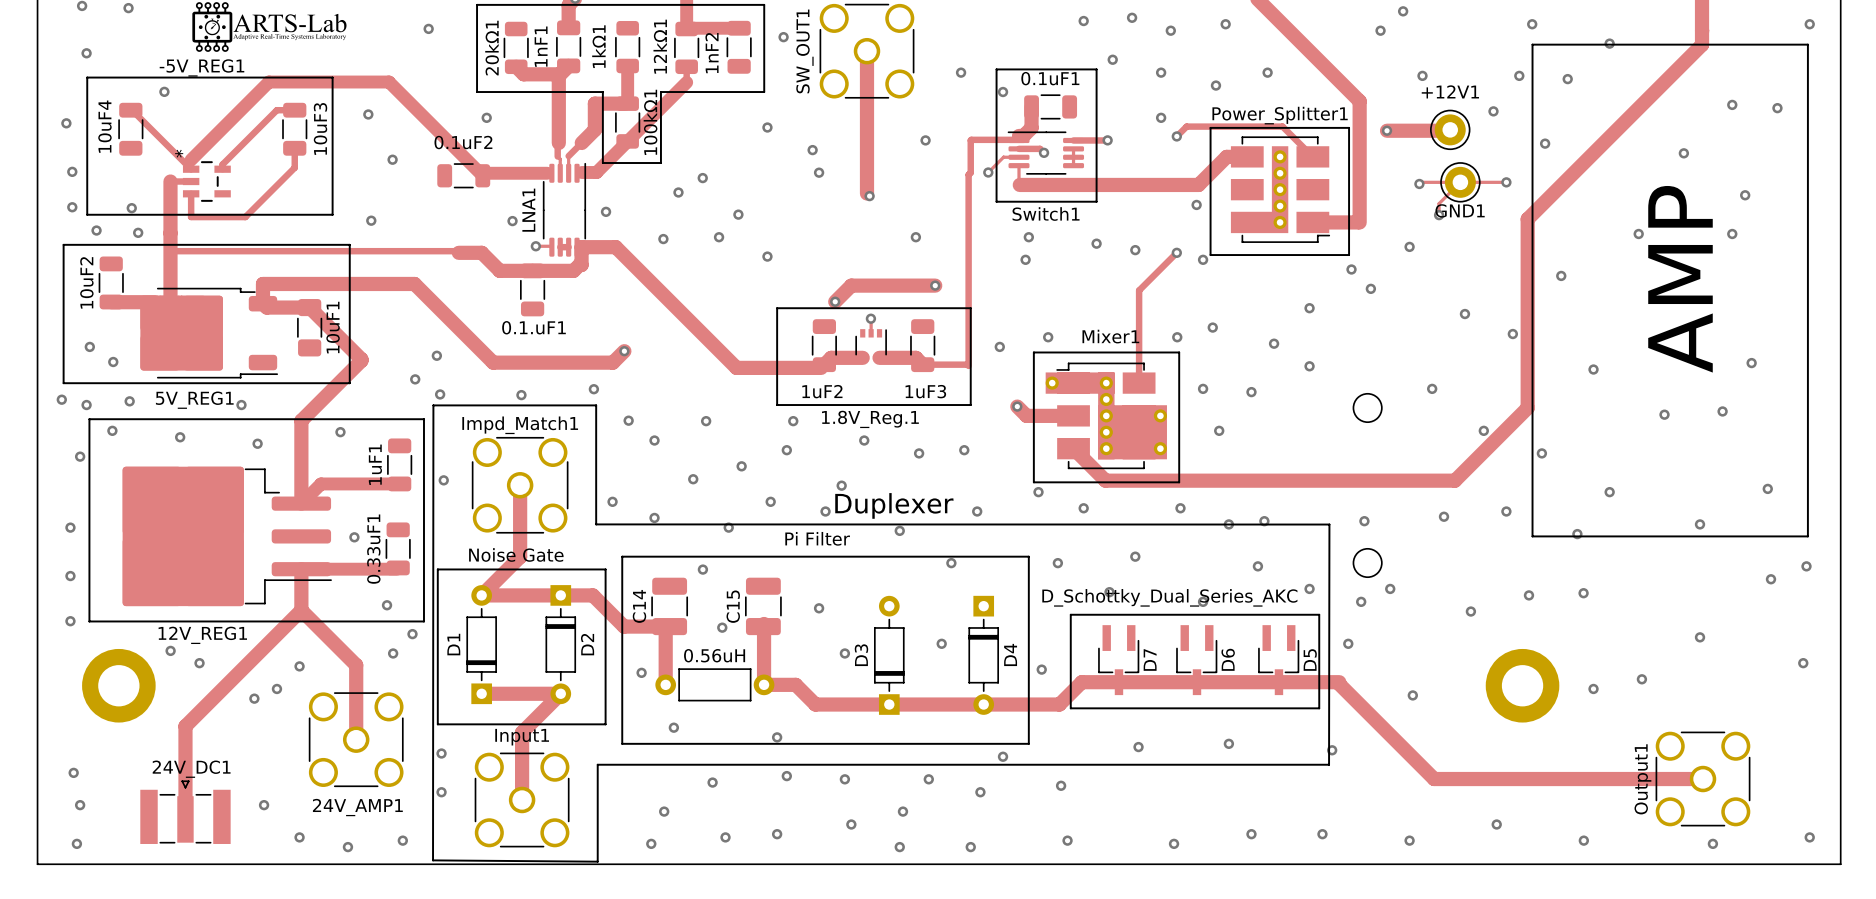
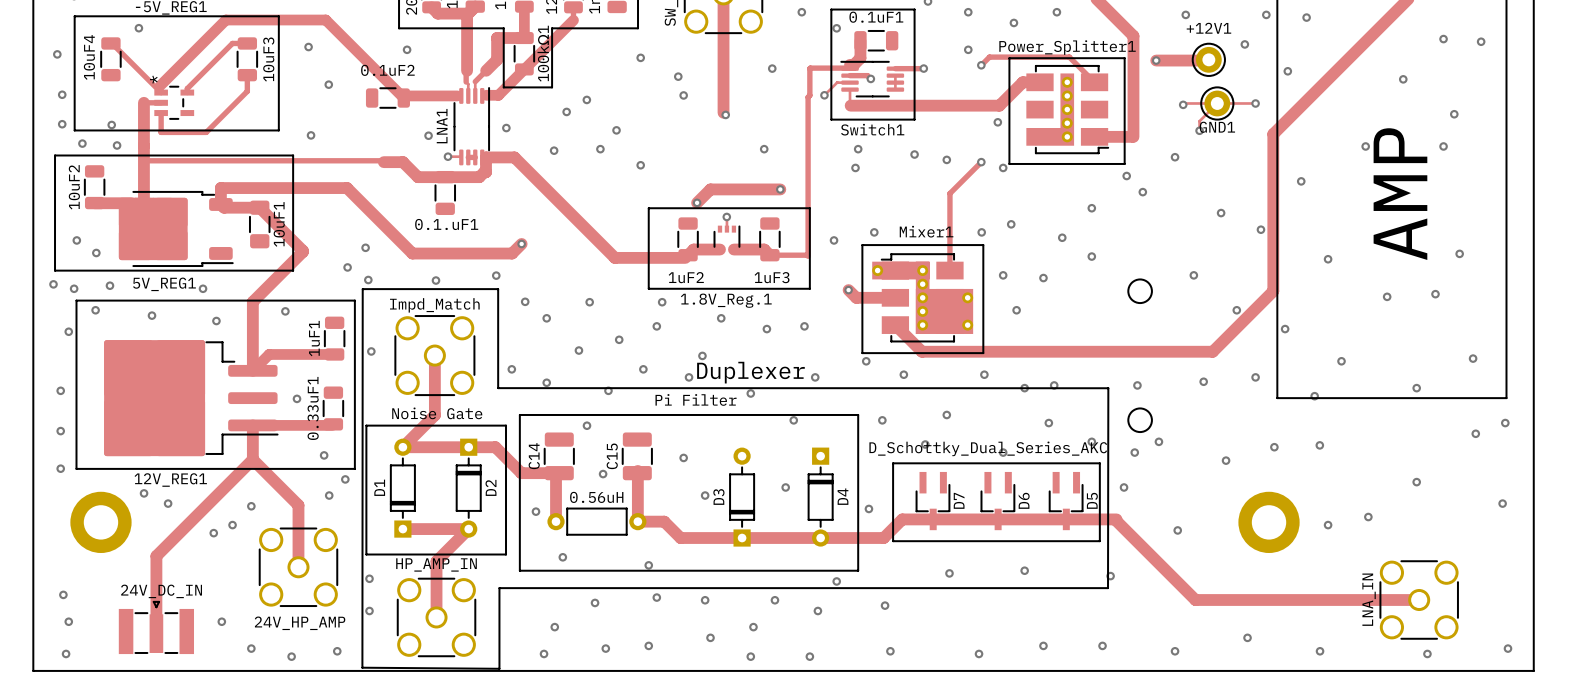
Impd_Match1 name: Impd_Match1 (520, 425) -> Impd_Match (434, 305)
Input1 name: Input1 (522, 737) -> HP_AMP_IN (436, 564)
24V_DC1 name: 24V_DC1 (191, 769) -> 24V_DC_IN (161, 591)
Output1 name: Output1 (1642, 779) -> LNA_IN (1369, 599)
24V_AMP1 name: 24V_AMP1 (357, 807) -> 24V_HP_AMP (300, 623)

